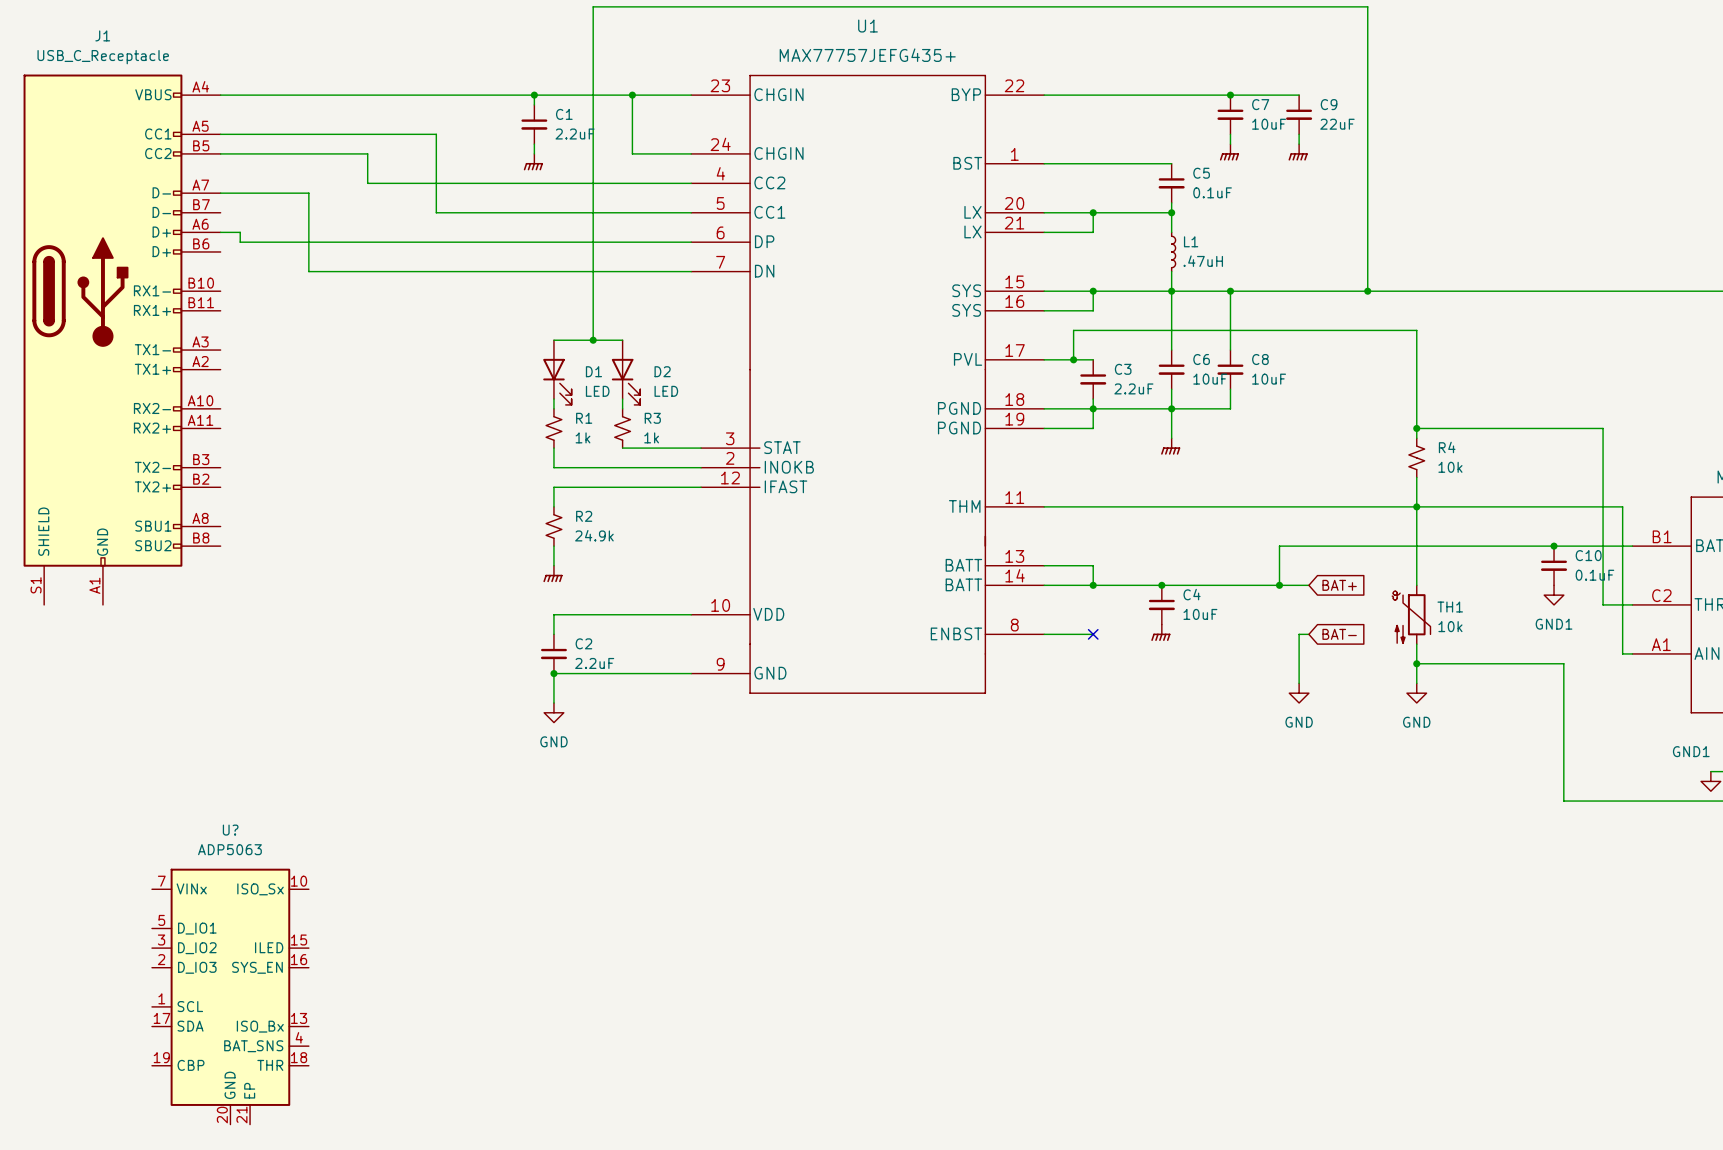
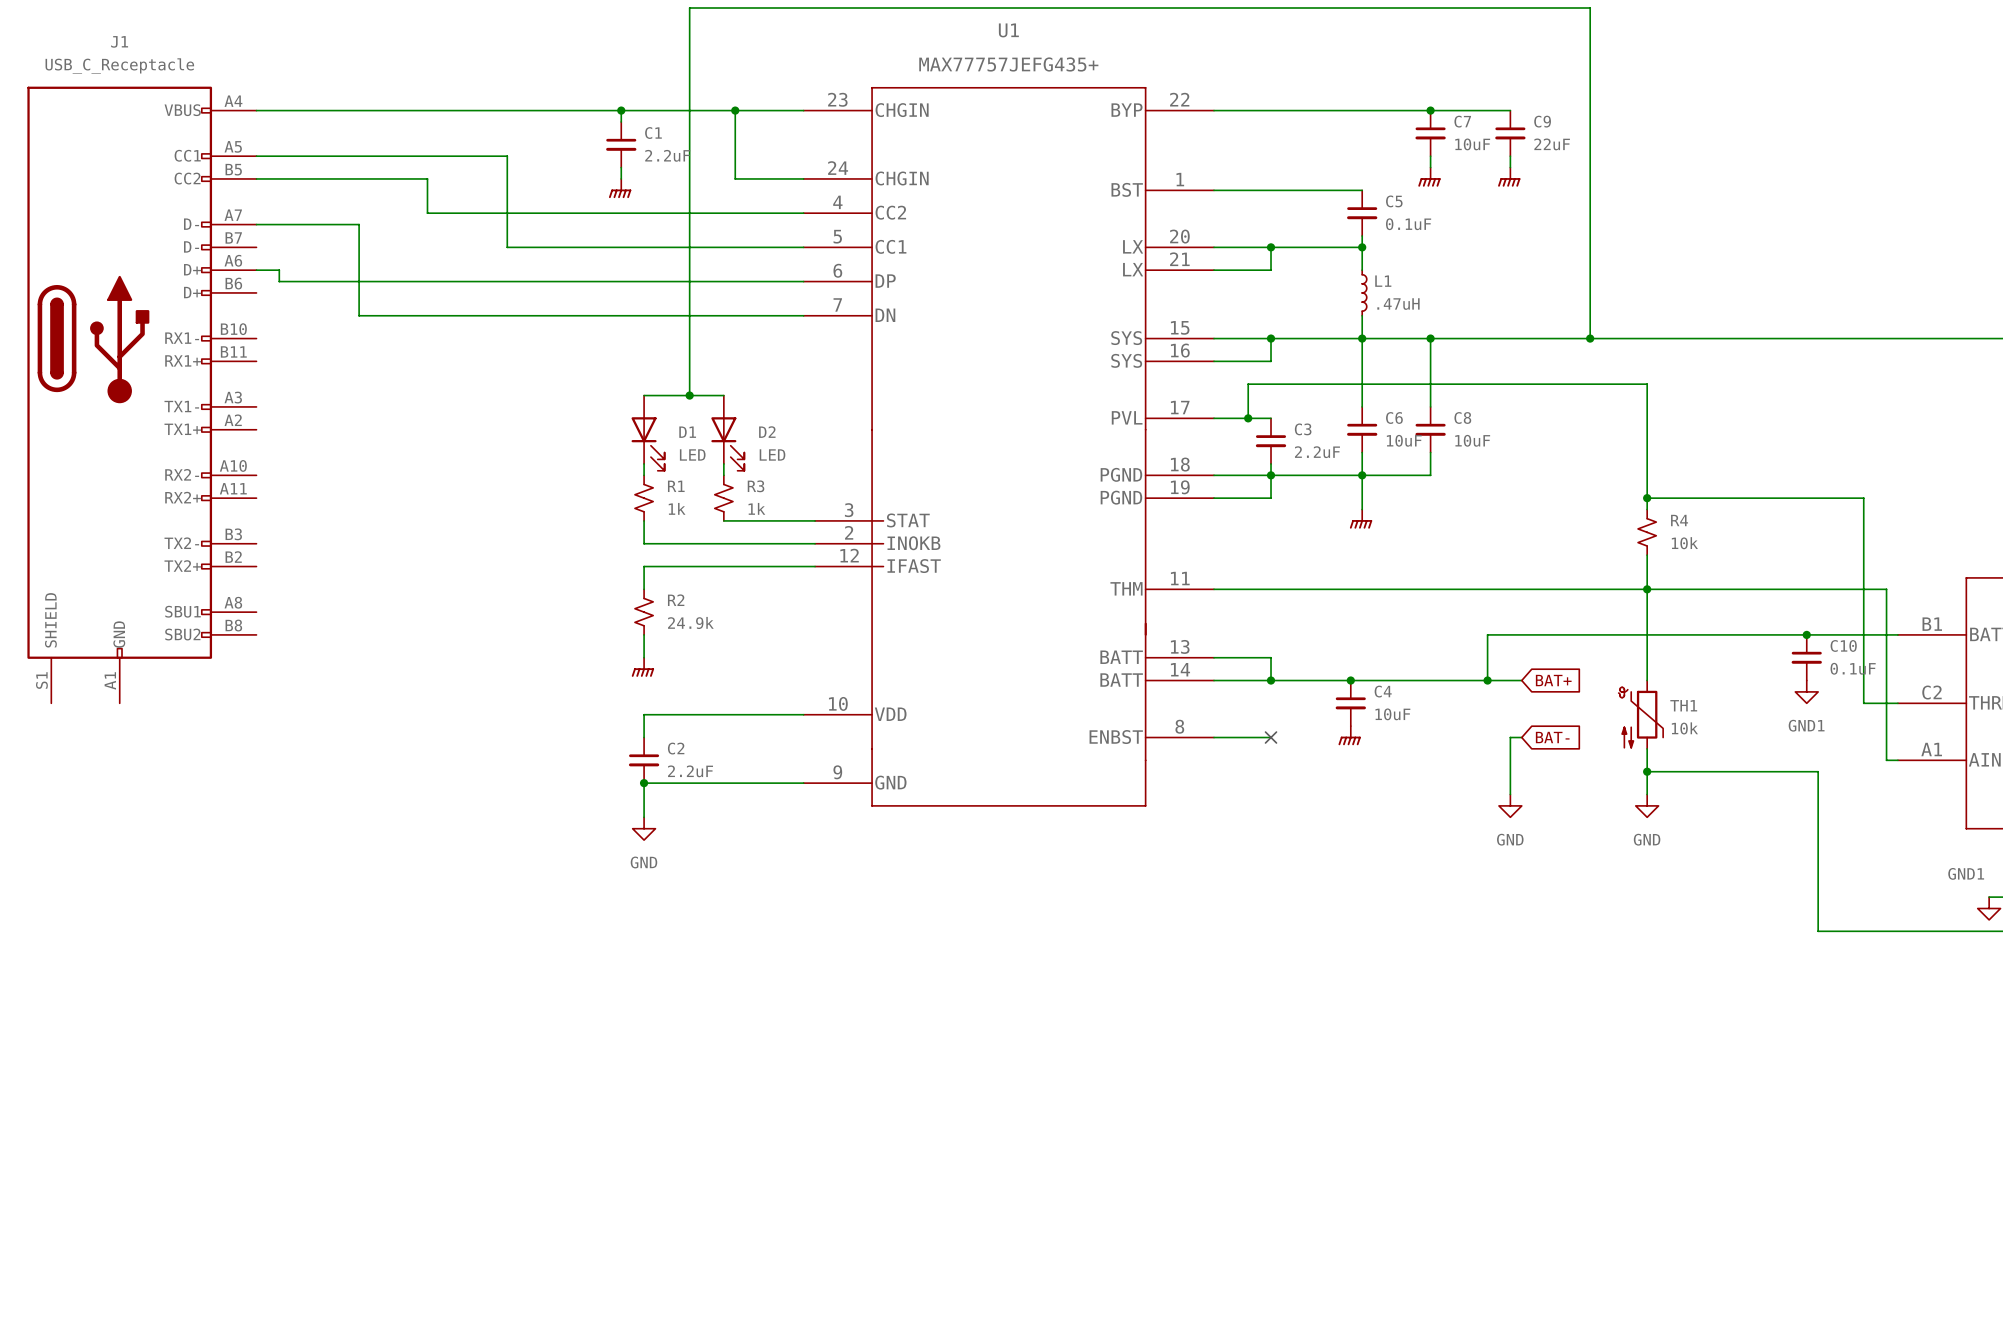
U?: ADP5063 (230, 996) -> none

